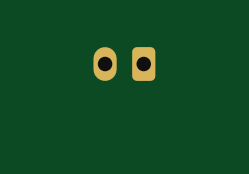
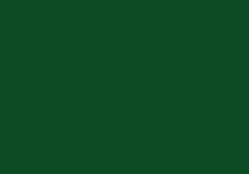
part: (124, 64) -> none

